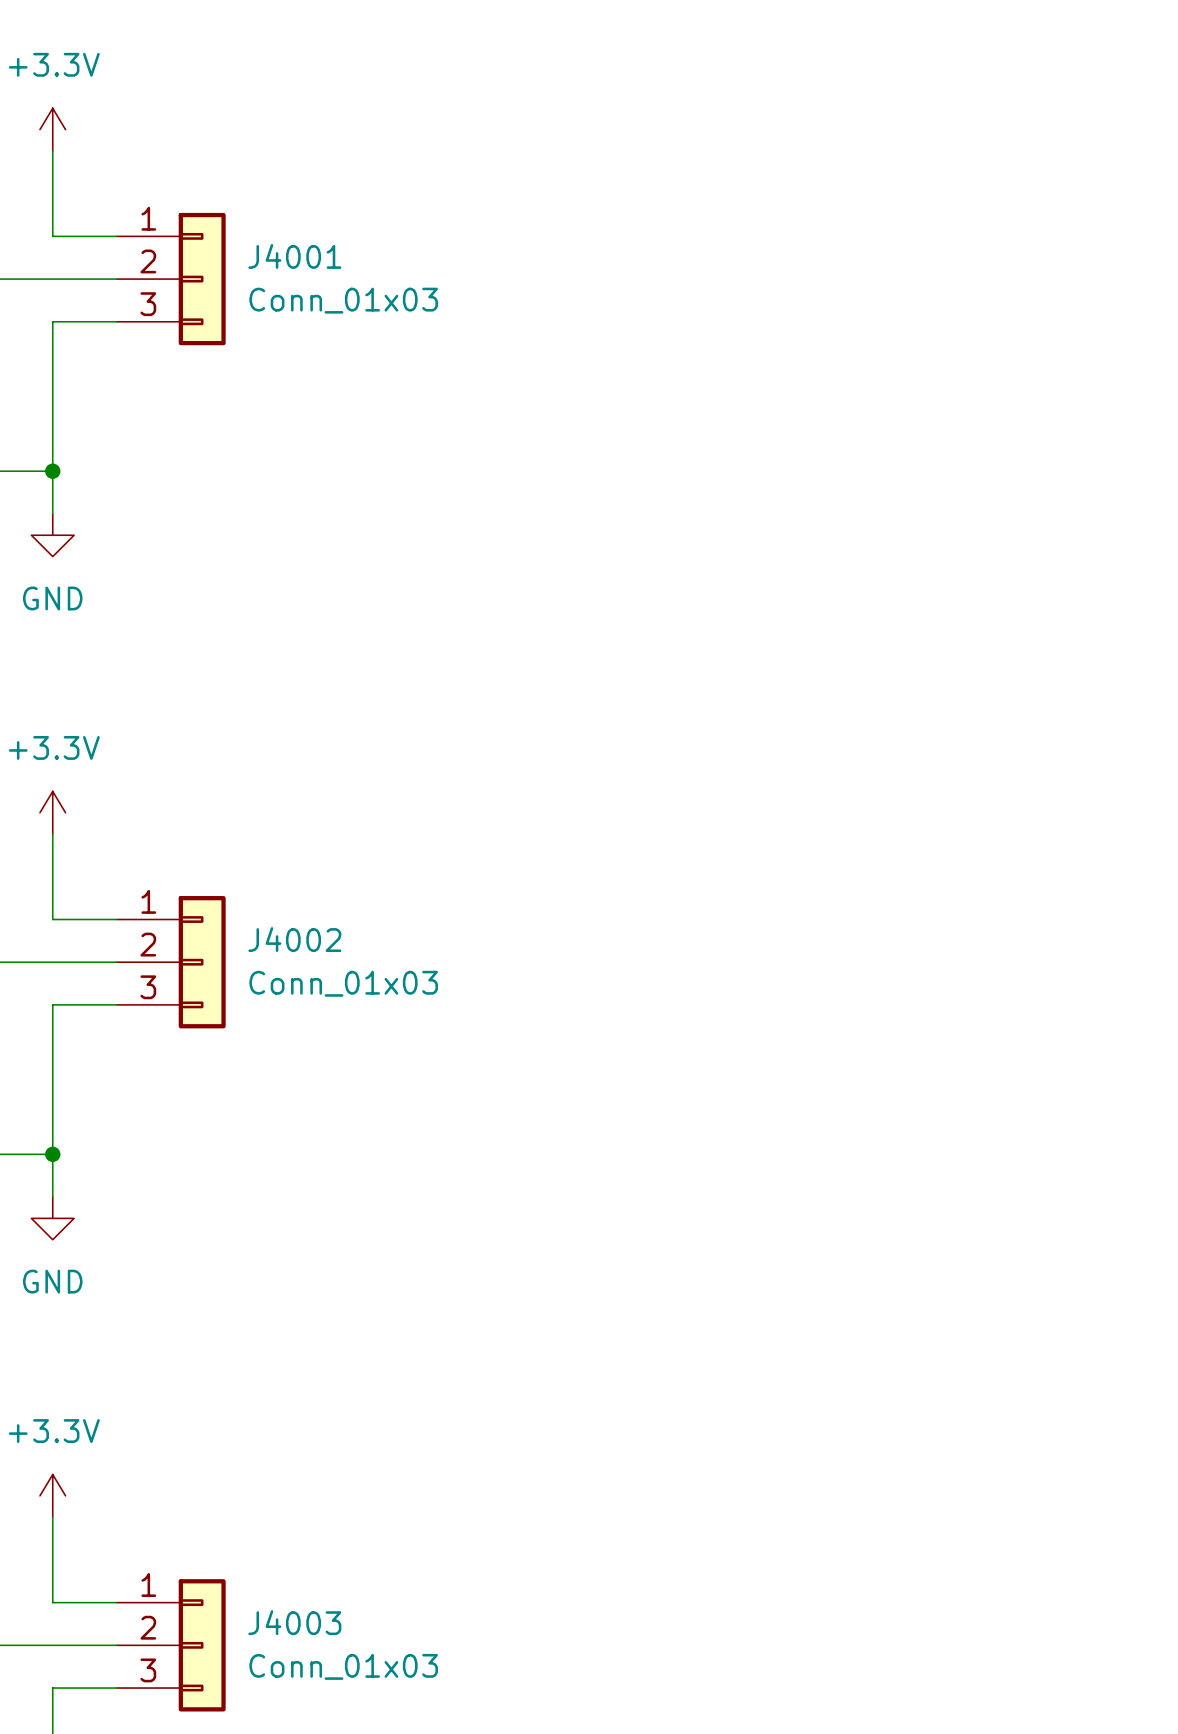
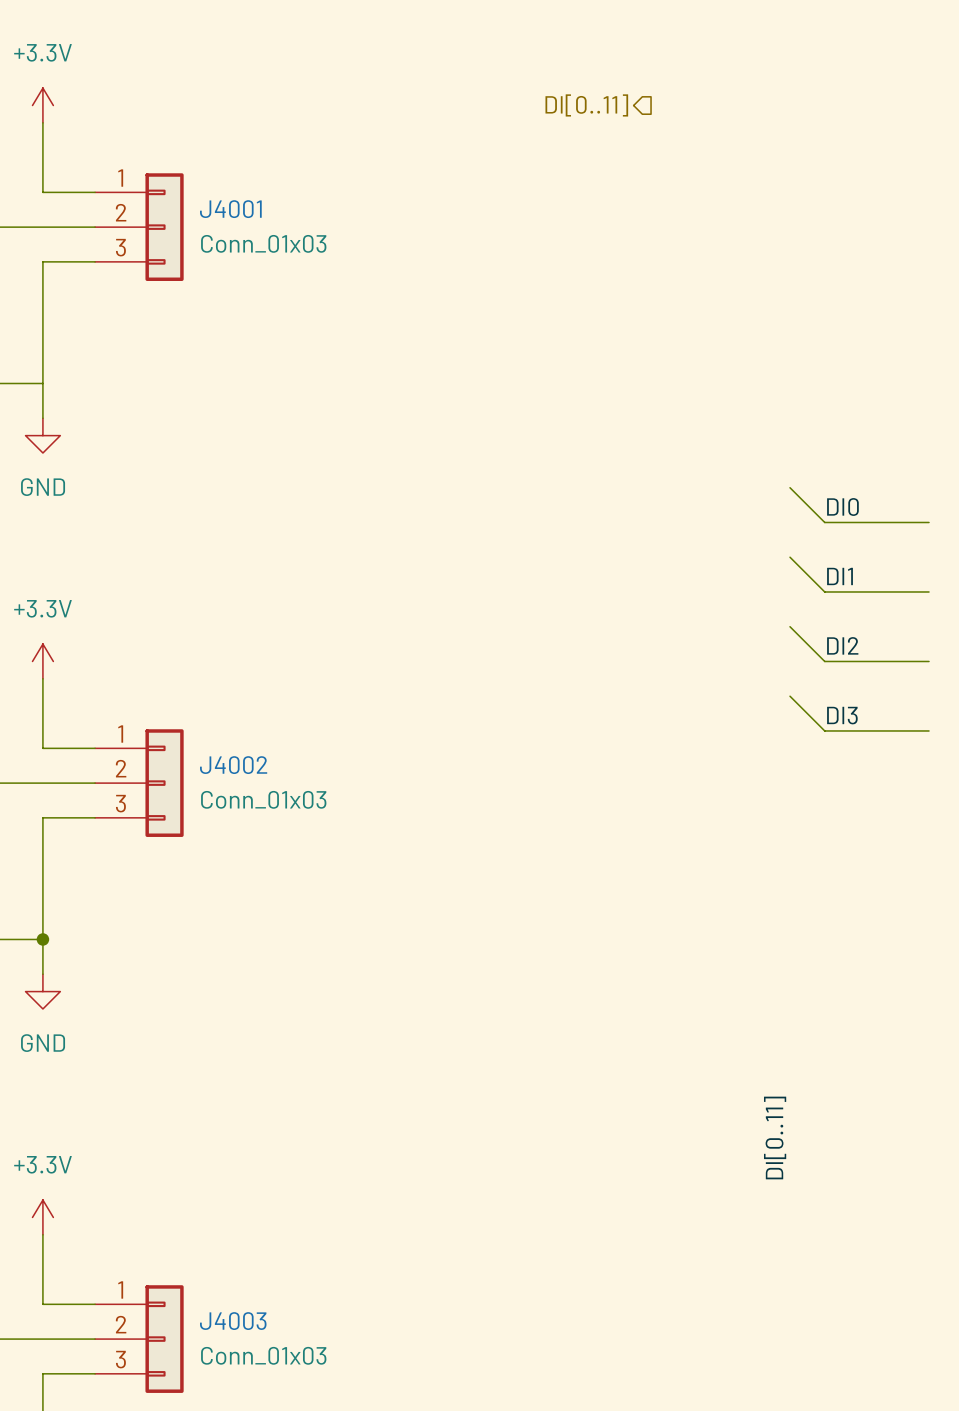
hierarchical label: none -> DI[0..11] (586, 105)
junction: (52, 471) -> none
wire: none -> (790, 487) (824, 522) (929, 522)
label: none -> DI0 (842, 507)
wire: none -> (790, 557) (824, 591) (929, 591)
label: none -> DI1 (840, 576)
wire: none -> (790, 626) (824, 661) (929, 661)
label: none -> DI2 (842, 645)
wire: none -> (790, 696) (824, 730) (929, 730)
label: none -> DI3 (842, 715)
label: none -> DI[0..11] (775, 1137)

